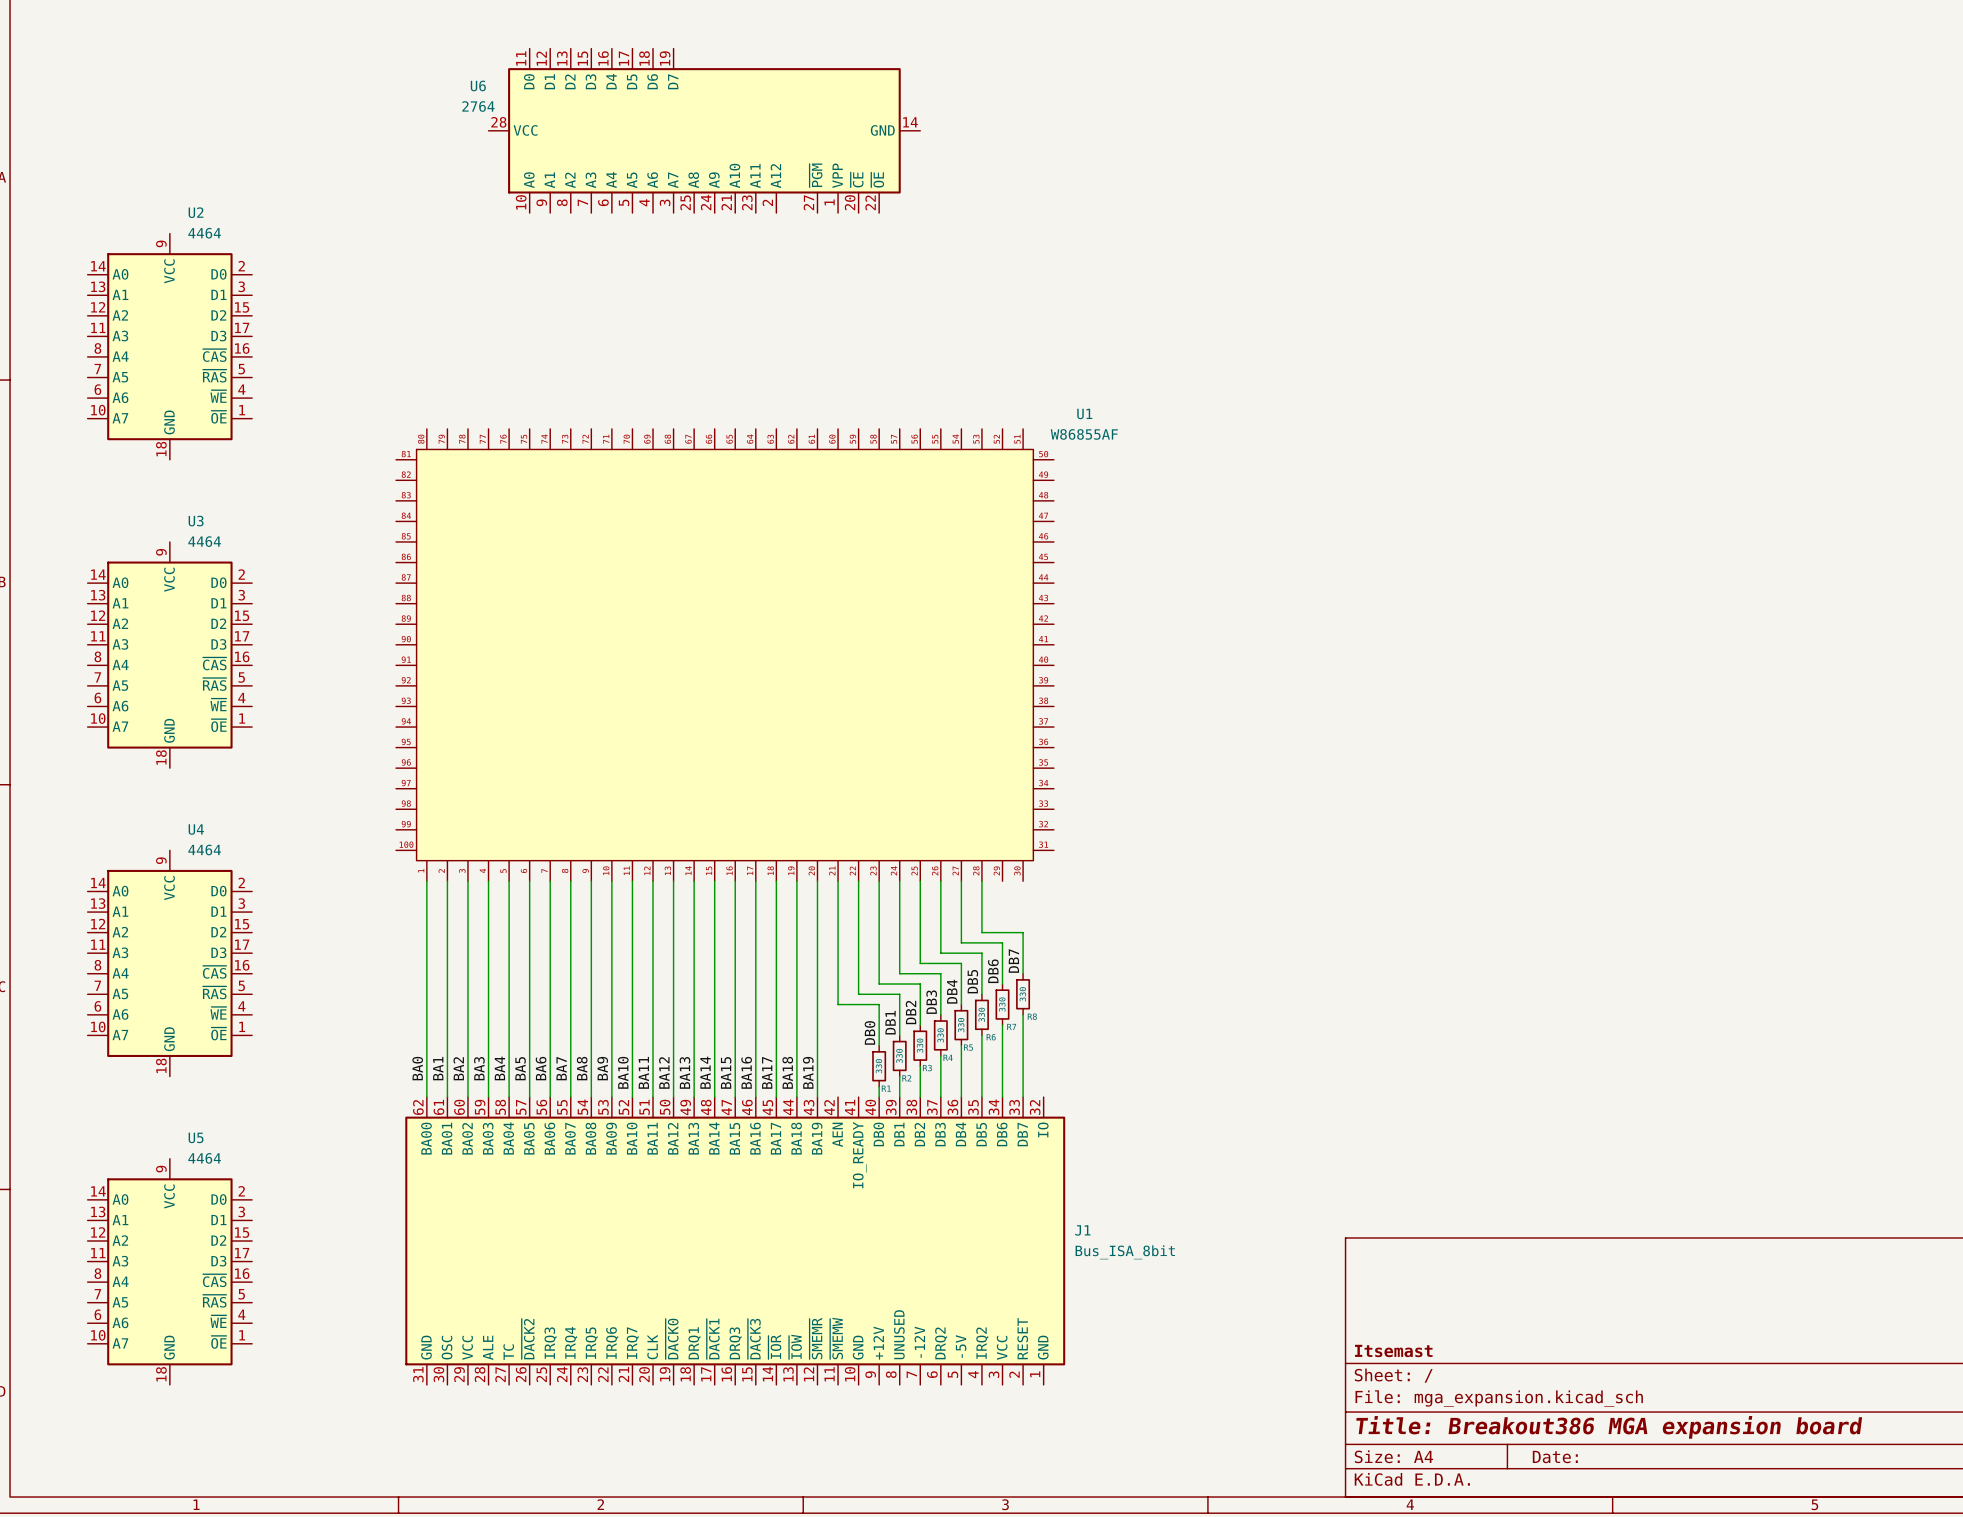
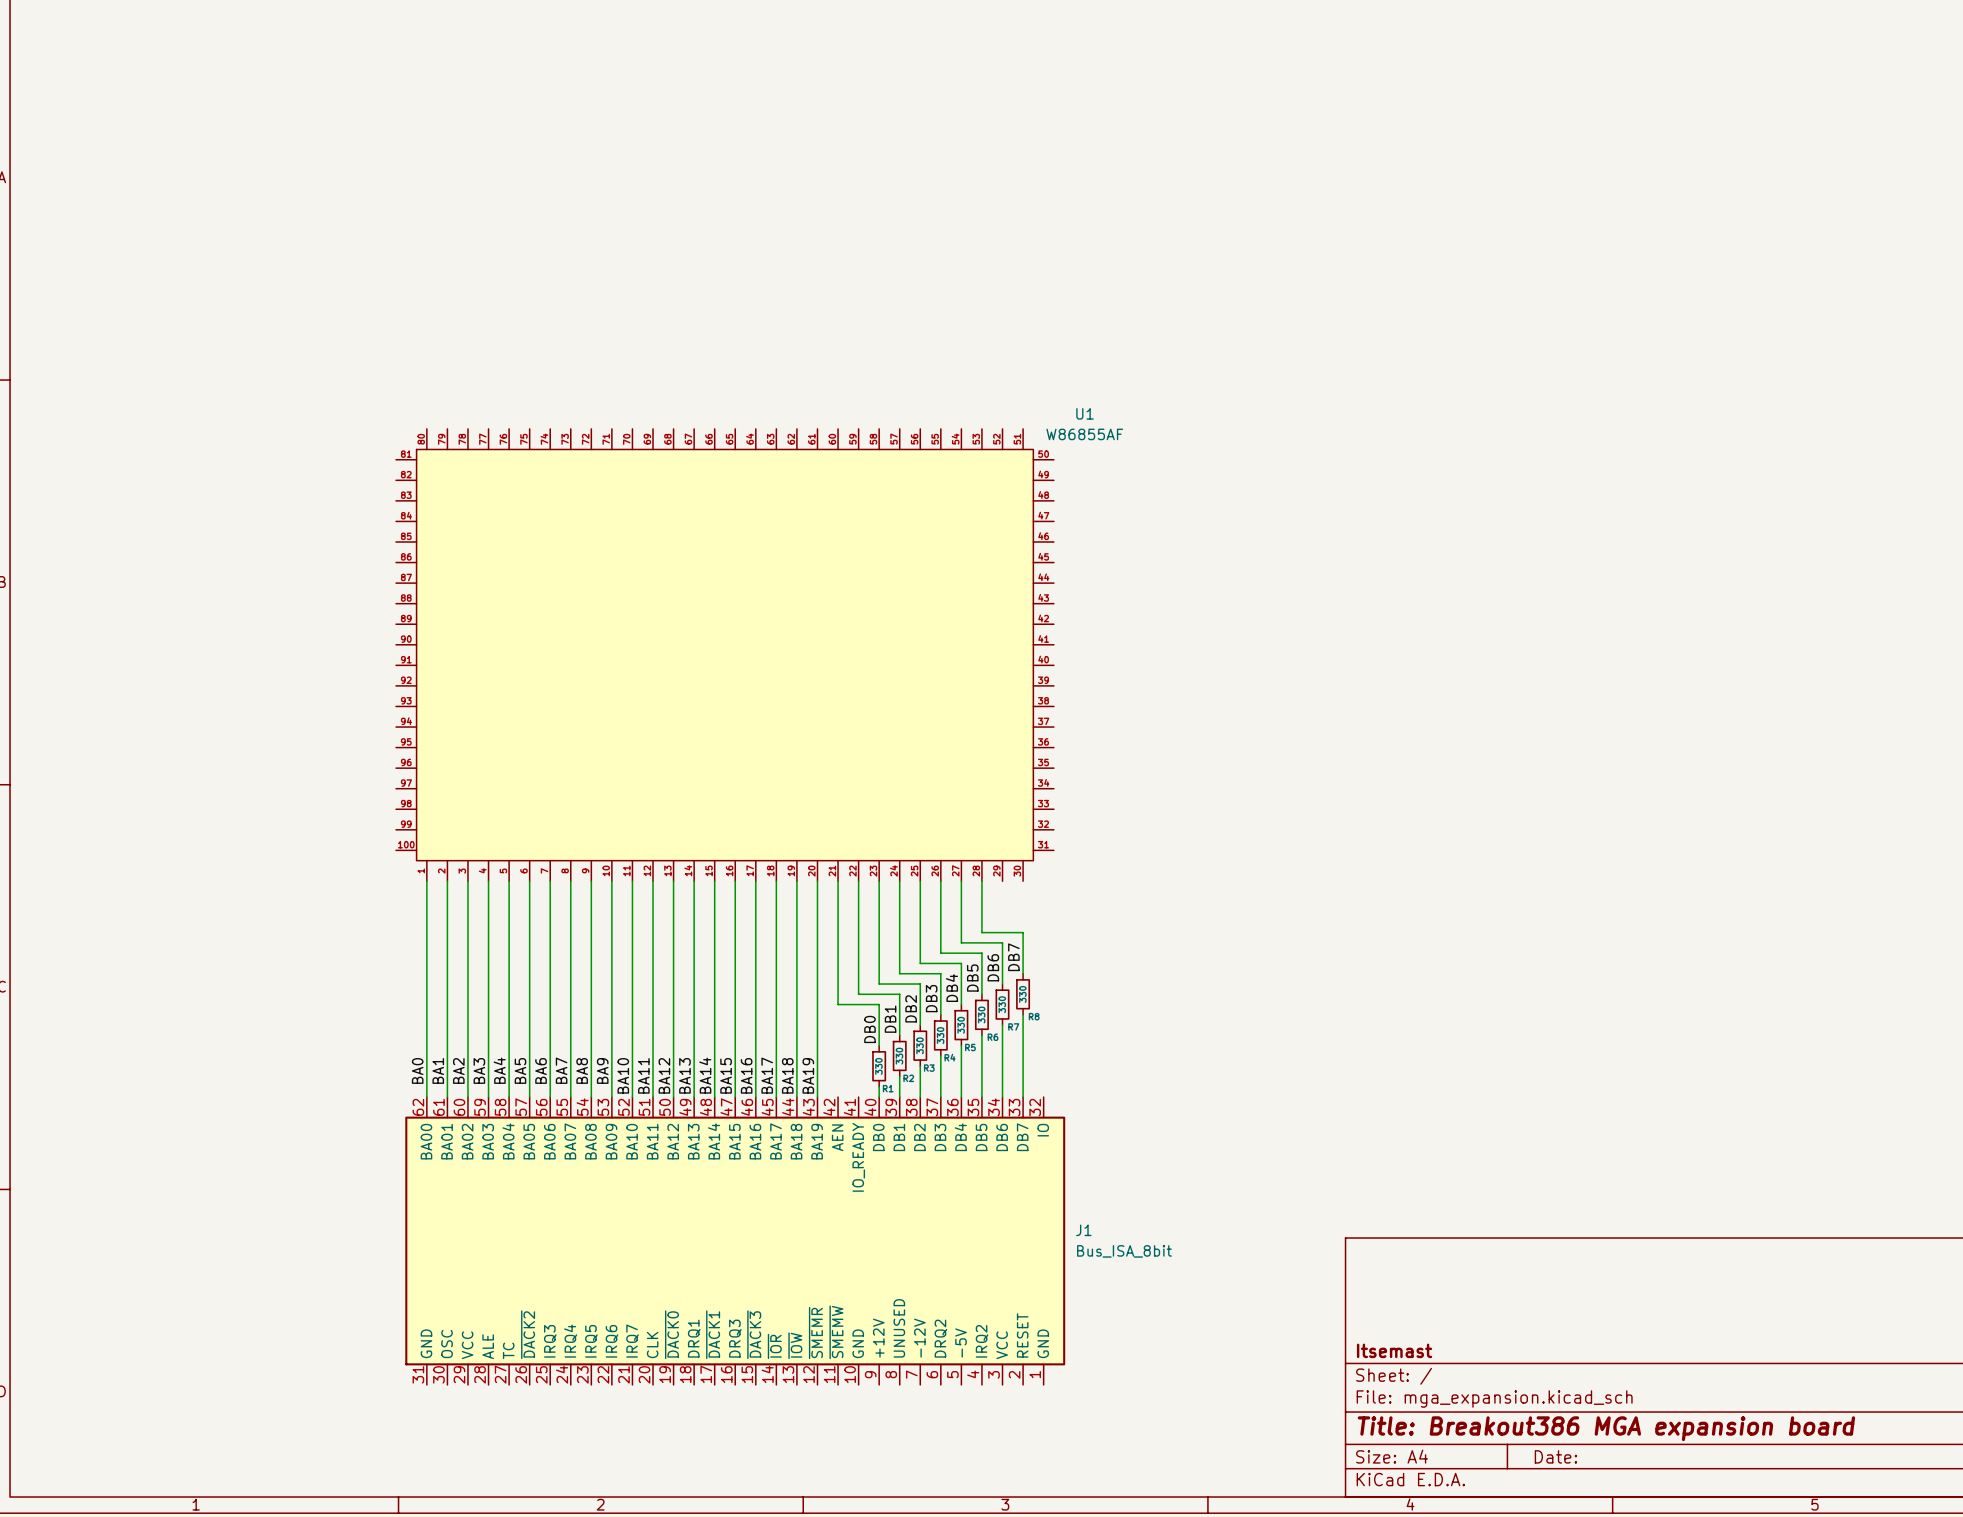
U6: 2764 (704, 130) -> none
U2: 4464 (169, 346) -> none
U3: 4464 (169, 655) -> none
U4: 4464 (169, 963) -> none
U5: 4464 (169, 1271) -> none

